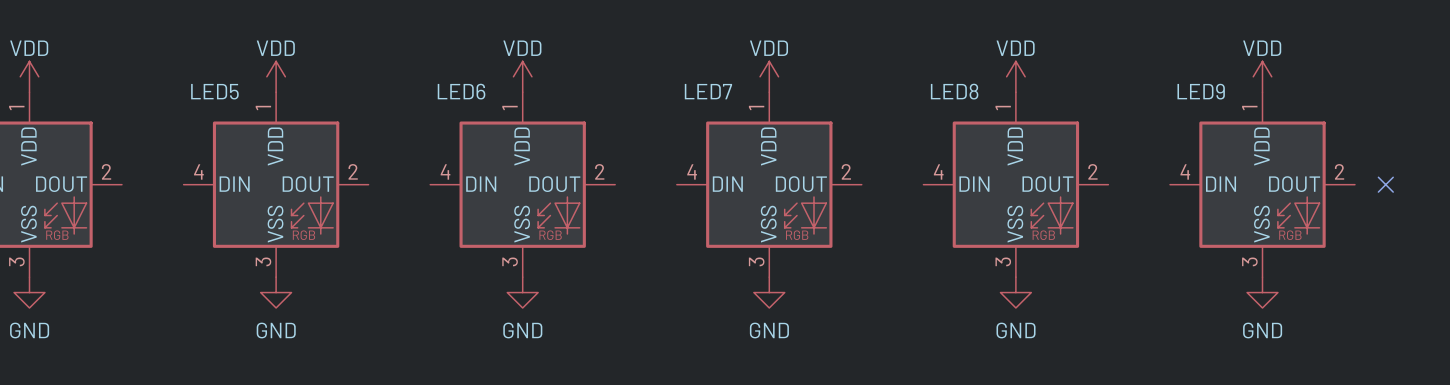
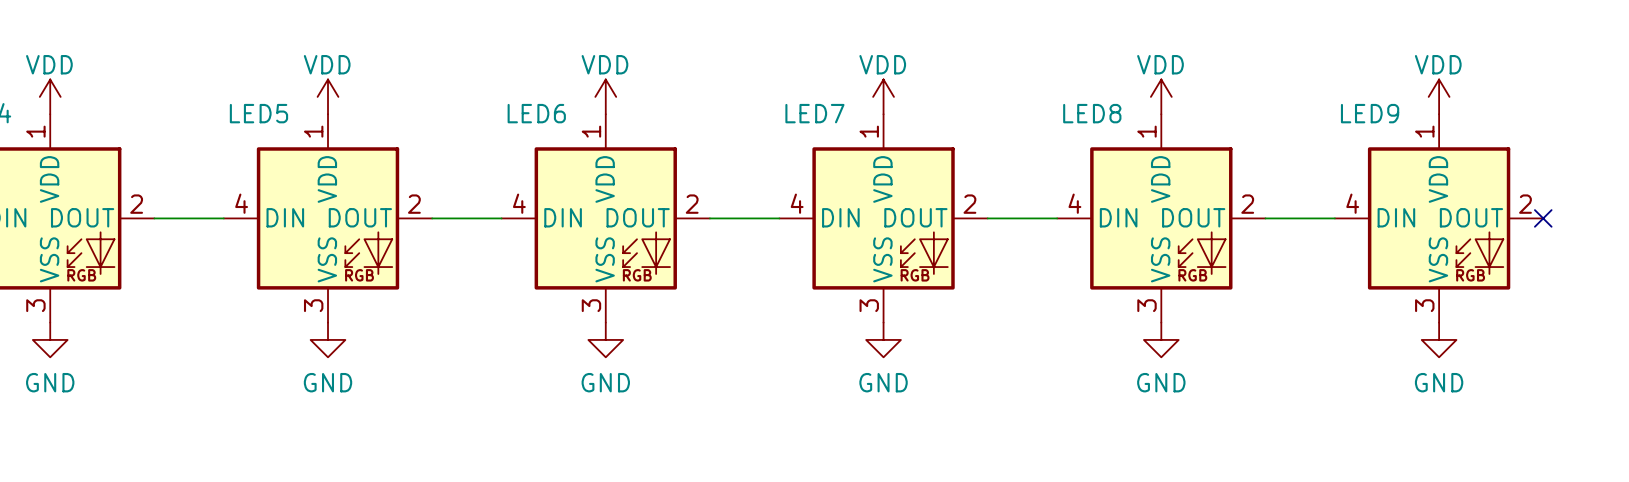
wire: none -> (154, 218) (223, 218)
wire: none -> (432, 218) (501, 218)
wire: none -> (709, 218) (779, 218)
wire: none -> (987, 218) (1057, 218)
wire: none -> (1265, 218) (1334, 218)
no-connect mark position: (1385, 184) -> (1543, 218)

